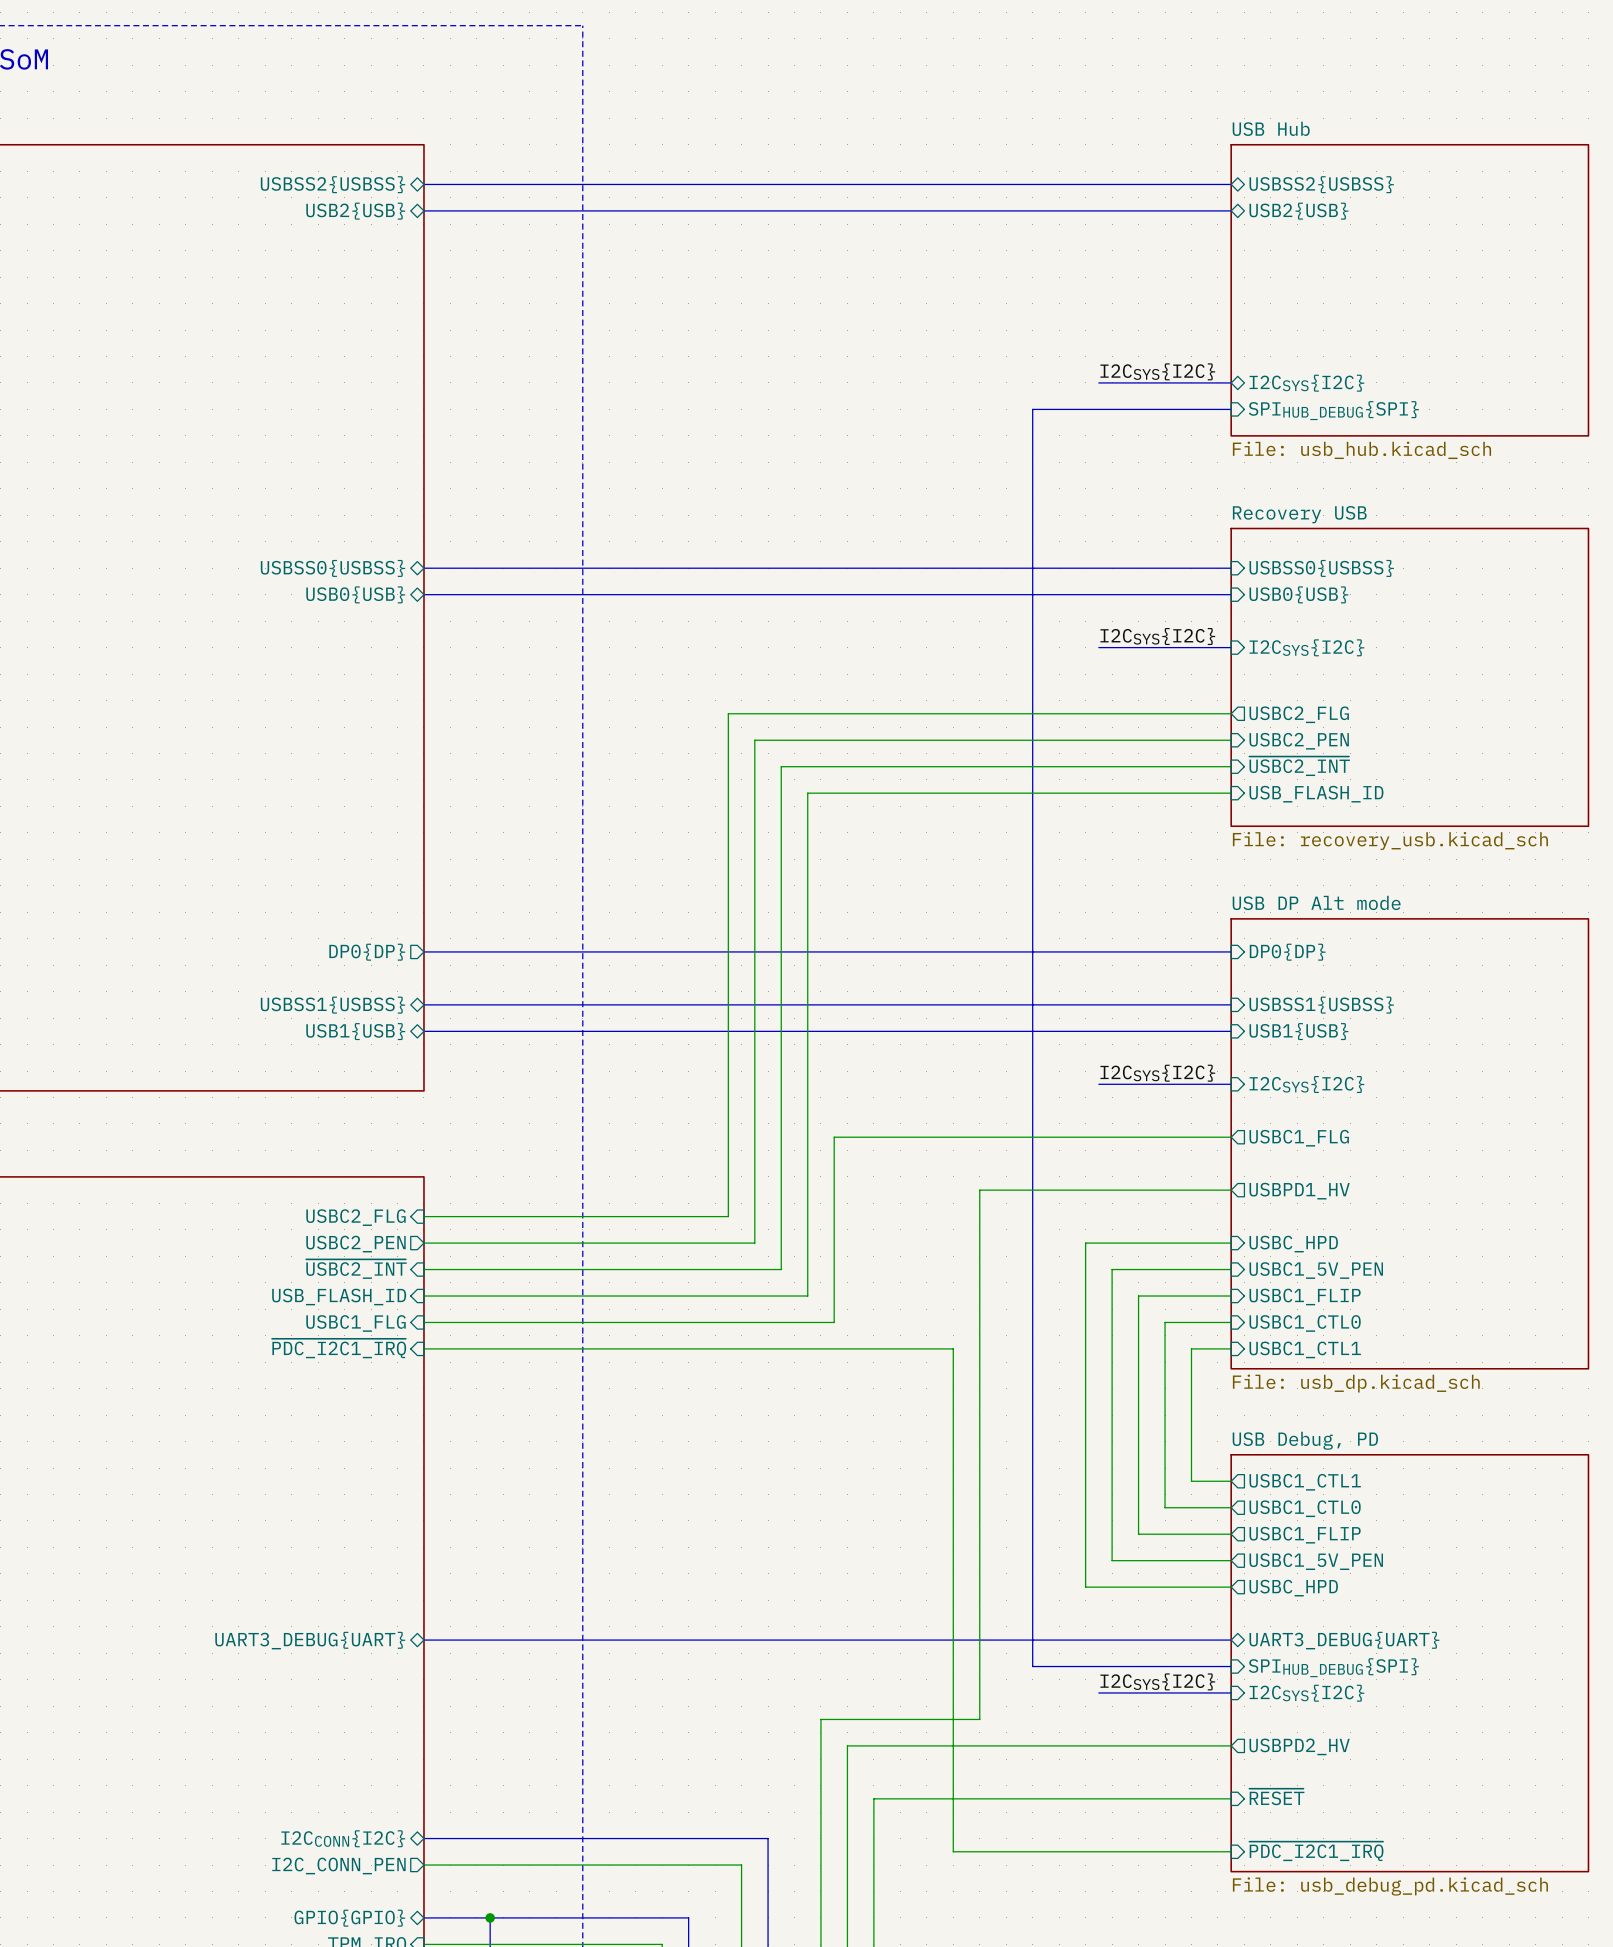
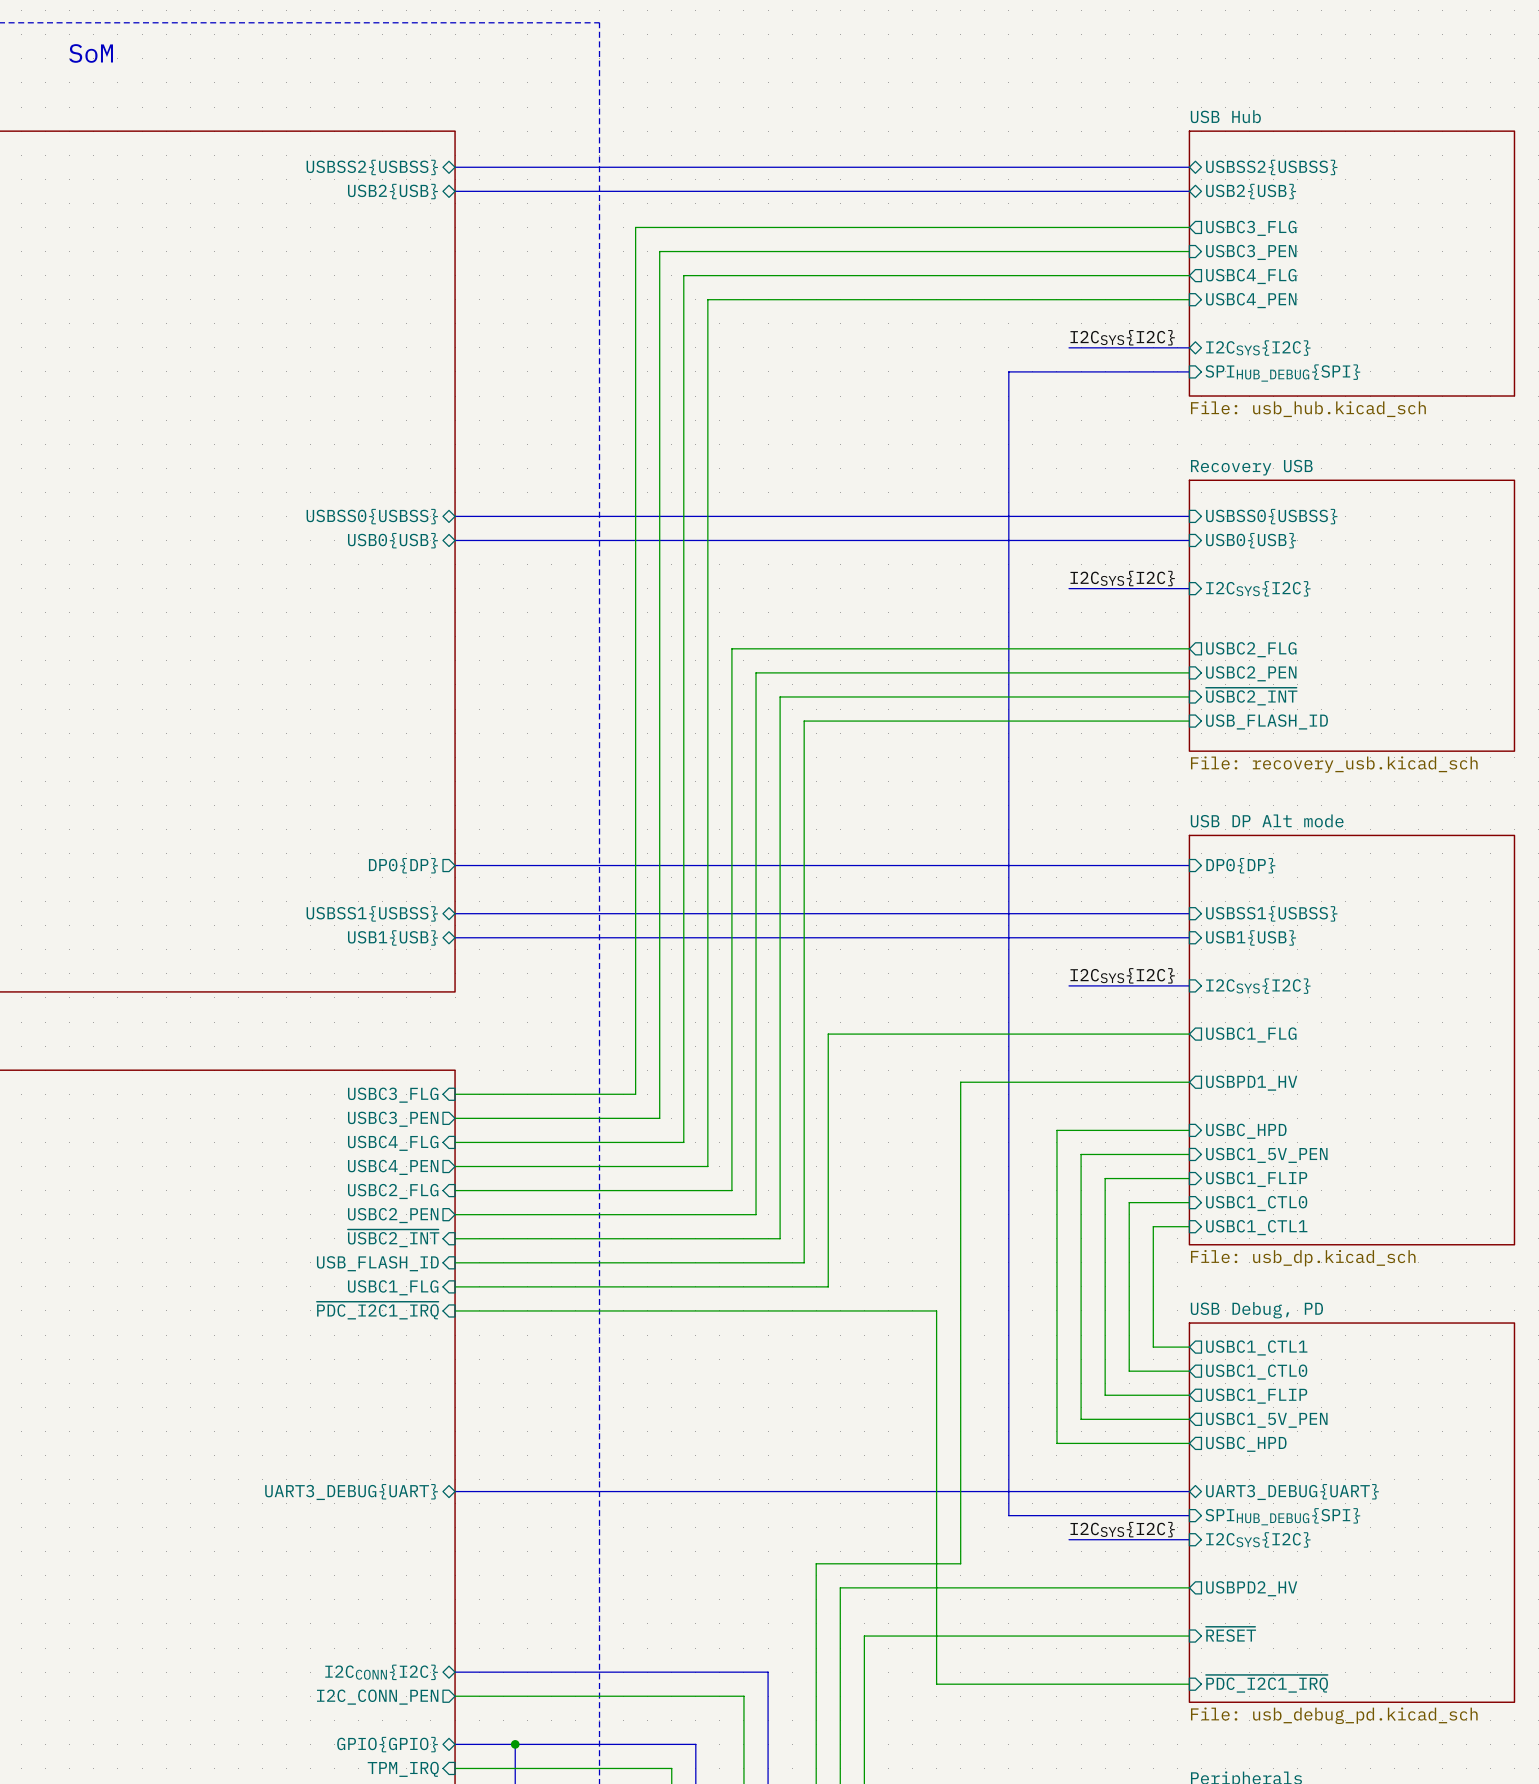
wire: none -> (1189, 227) (635, 227) (635, 1094) (455, 1094)
sheet pin: none -> USBC3_FLG (1251, 228)
wire: none -> (1189, 251) (659, 251) (659, 1118) (455, 1118)
sheet pin: none -> USBC3_PEN (1251, 252)
wire: none -> (1189, 275) (683, 275) (683, 1142) (455, 1142)
sheet pin: none -> USBC4_FLG (1251, 276)
wire: none -> (1189, 299) (707, 299) (707, 1166) (455, 1166)
sheet pin: none -> USBC4_PEN (1251, 300)
sheet pin: none -> USBC3_FLG (393, 1095)
wire: (423, 1216) (728, 1216) -> (455, 1190) (731, 1190) (731, 1106)
sheet pin position: USBC2_FLG (356, 1217) -> USBC2_FLG (393, 1191)
sheet pin: none -> USBC3_PEN (393, 1119)
wire: (423, 1243) (754, 1243) -> (455, 1214) (756, 1214) (756, 1130)
sheet pin position: USBC2_PEN (355, 1244) -> USBC2_PEN (393, 1215)
sheet pin: none -> USBC4_FLG (393, 1143)
sheet pin position: ~{USBC2_INT} (356, 1269) -> ~{USBC2_INT} (393, 1238)
wire: (423, 1269) (781, 1269) -> (455, 1238) (780, 1238) (780, 1154)
sheet pin: none -> USBC4_PEN (393, 1167)
wire: (423, 1296) (807, 1296) -> (455, 1262) (804, 1262) (804, 1178)
sheet pin position: USB_FLASH_ID (339, 1297) -> USB_FLASH_ID (377, 1263)
wire: (423, 1322) (834, 1322) -> (455, 1286) (828, 1286) (828, 1202)
sheet pin position: USBC1_FLG (356, 1323) -> USBC1_FLG (393, 1287)
sheet pin position: ~{PDC_I2C1_IRQ} (339, 1348) -> ~{PDC_I2C1_IRQ} (377, 1310)
wire: (423, 1348) (953, 1348) (953, 1441) -> (455, 1310) (936, 1310)

